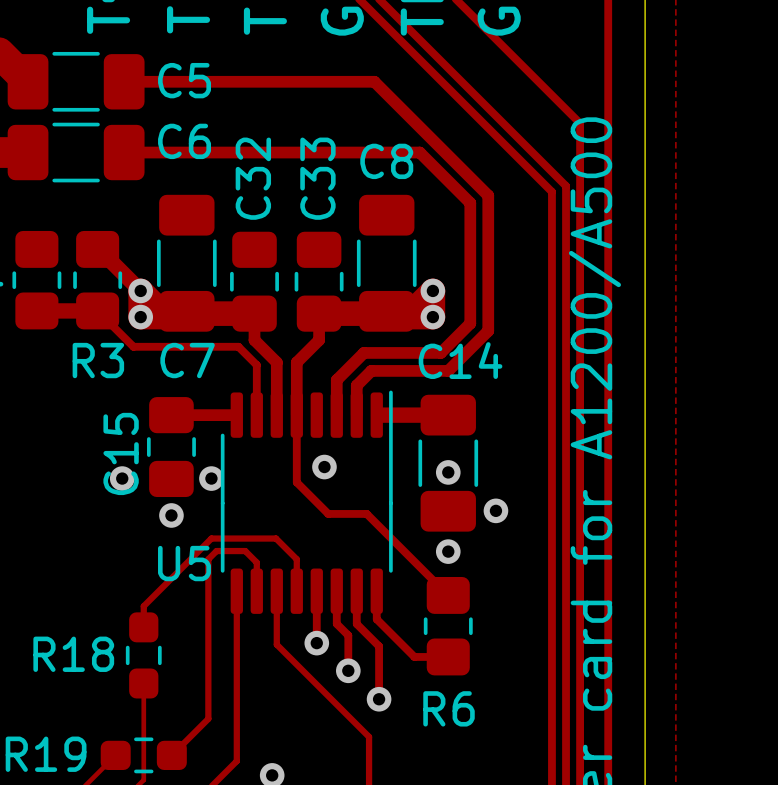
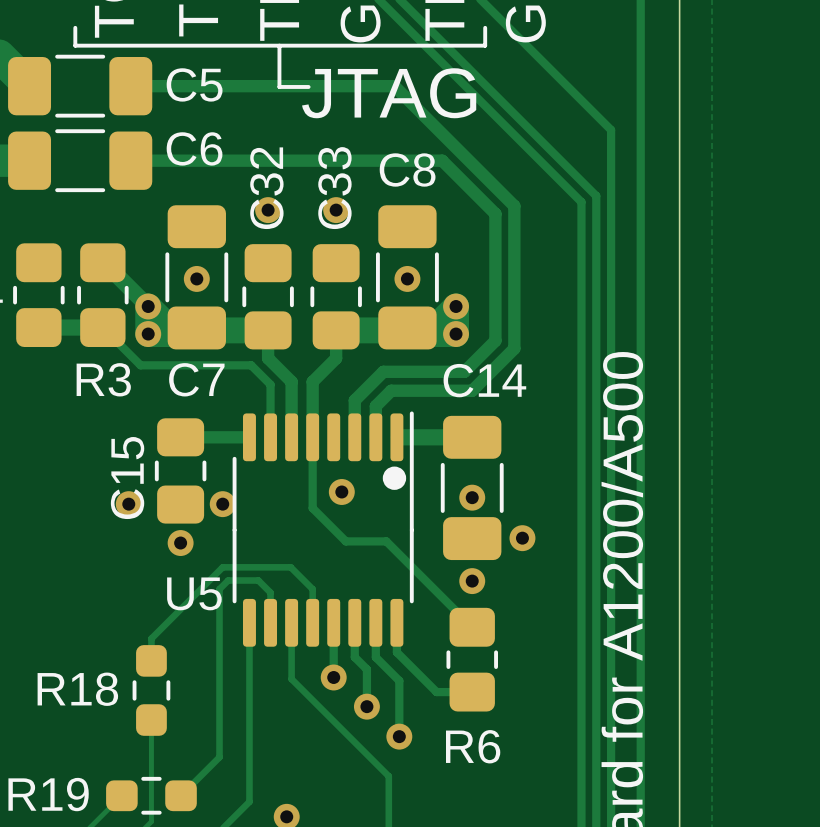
line: none -> (75, 27) (75, 45) (485, 45) (485, 27)
line: none -> (279, 45) (279, 86) (308, 86)
text: none -> JTAG (389, 93)
via: none -> (268, 210)
via: none -> (336, 210)
via: none -> (196, 278)
via: none -> (407, 278)
U5 footprint: [220, 390, 393, 614] -> [232, 411, 414, 647]

